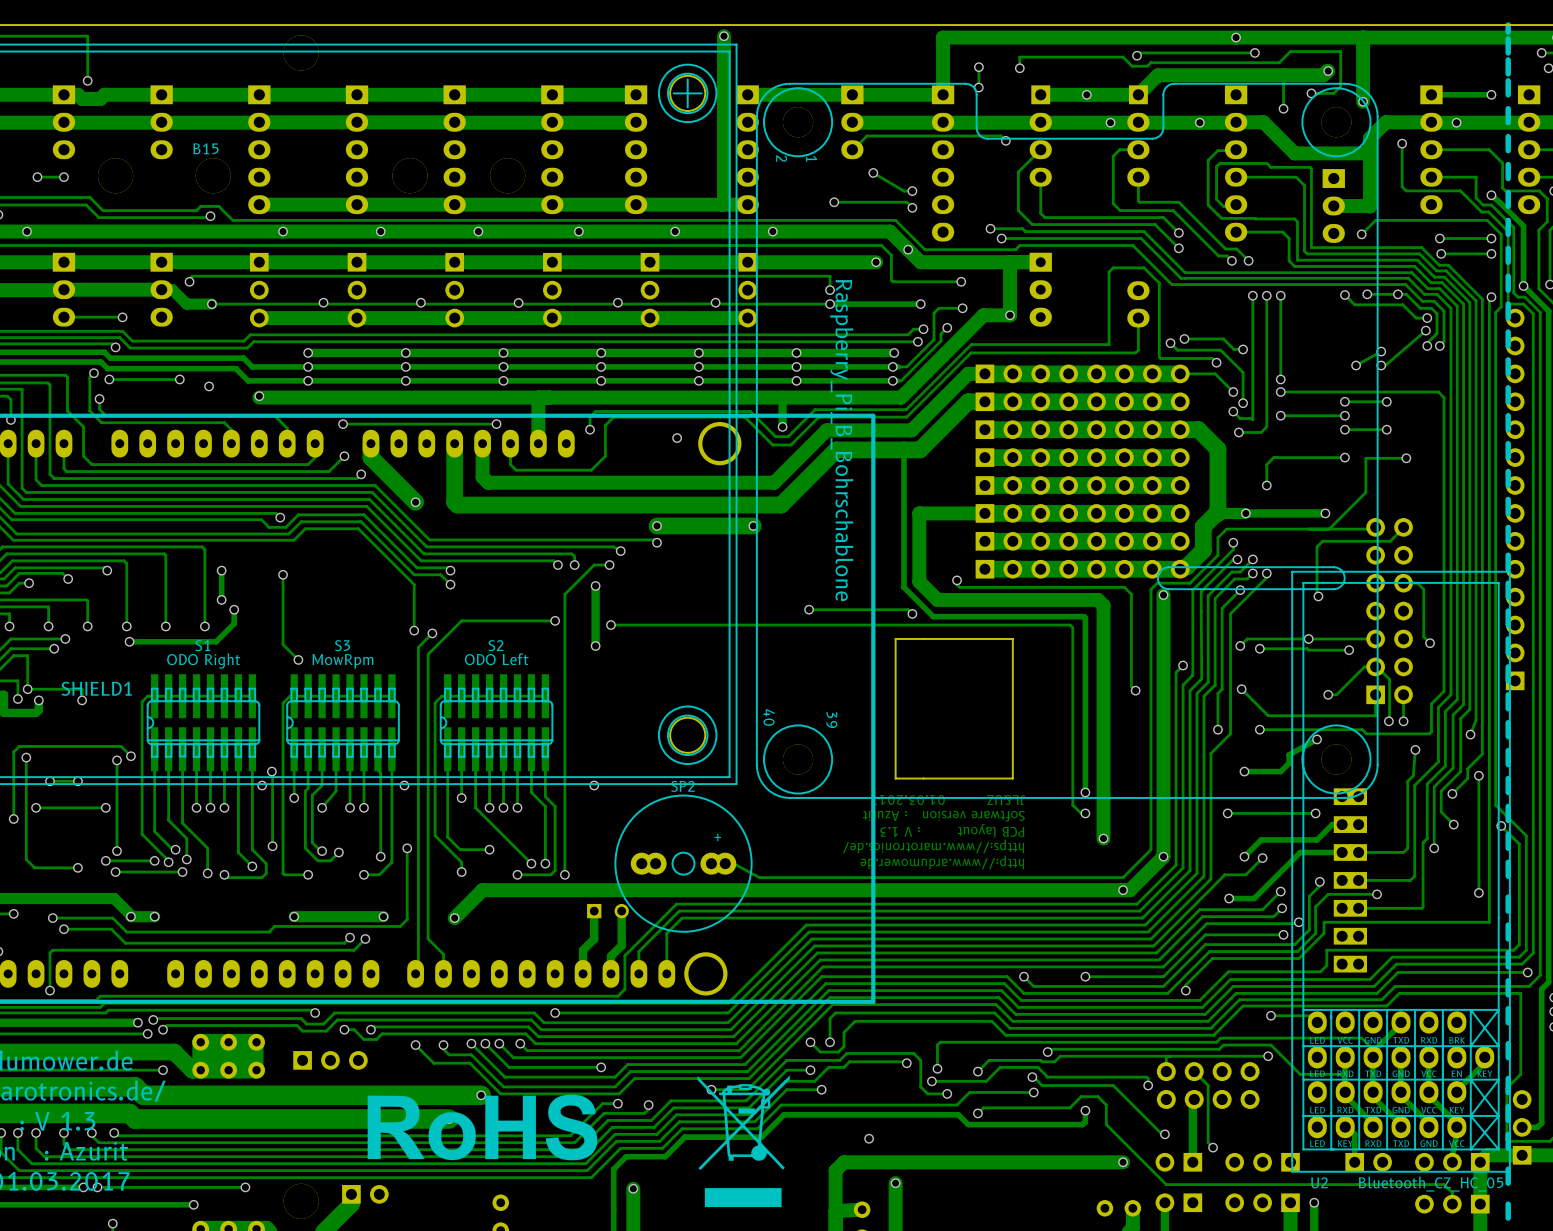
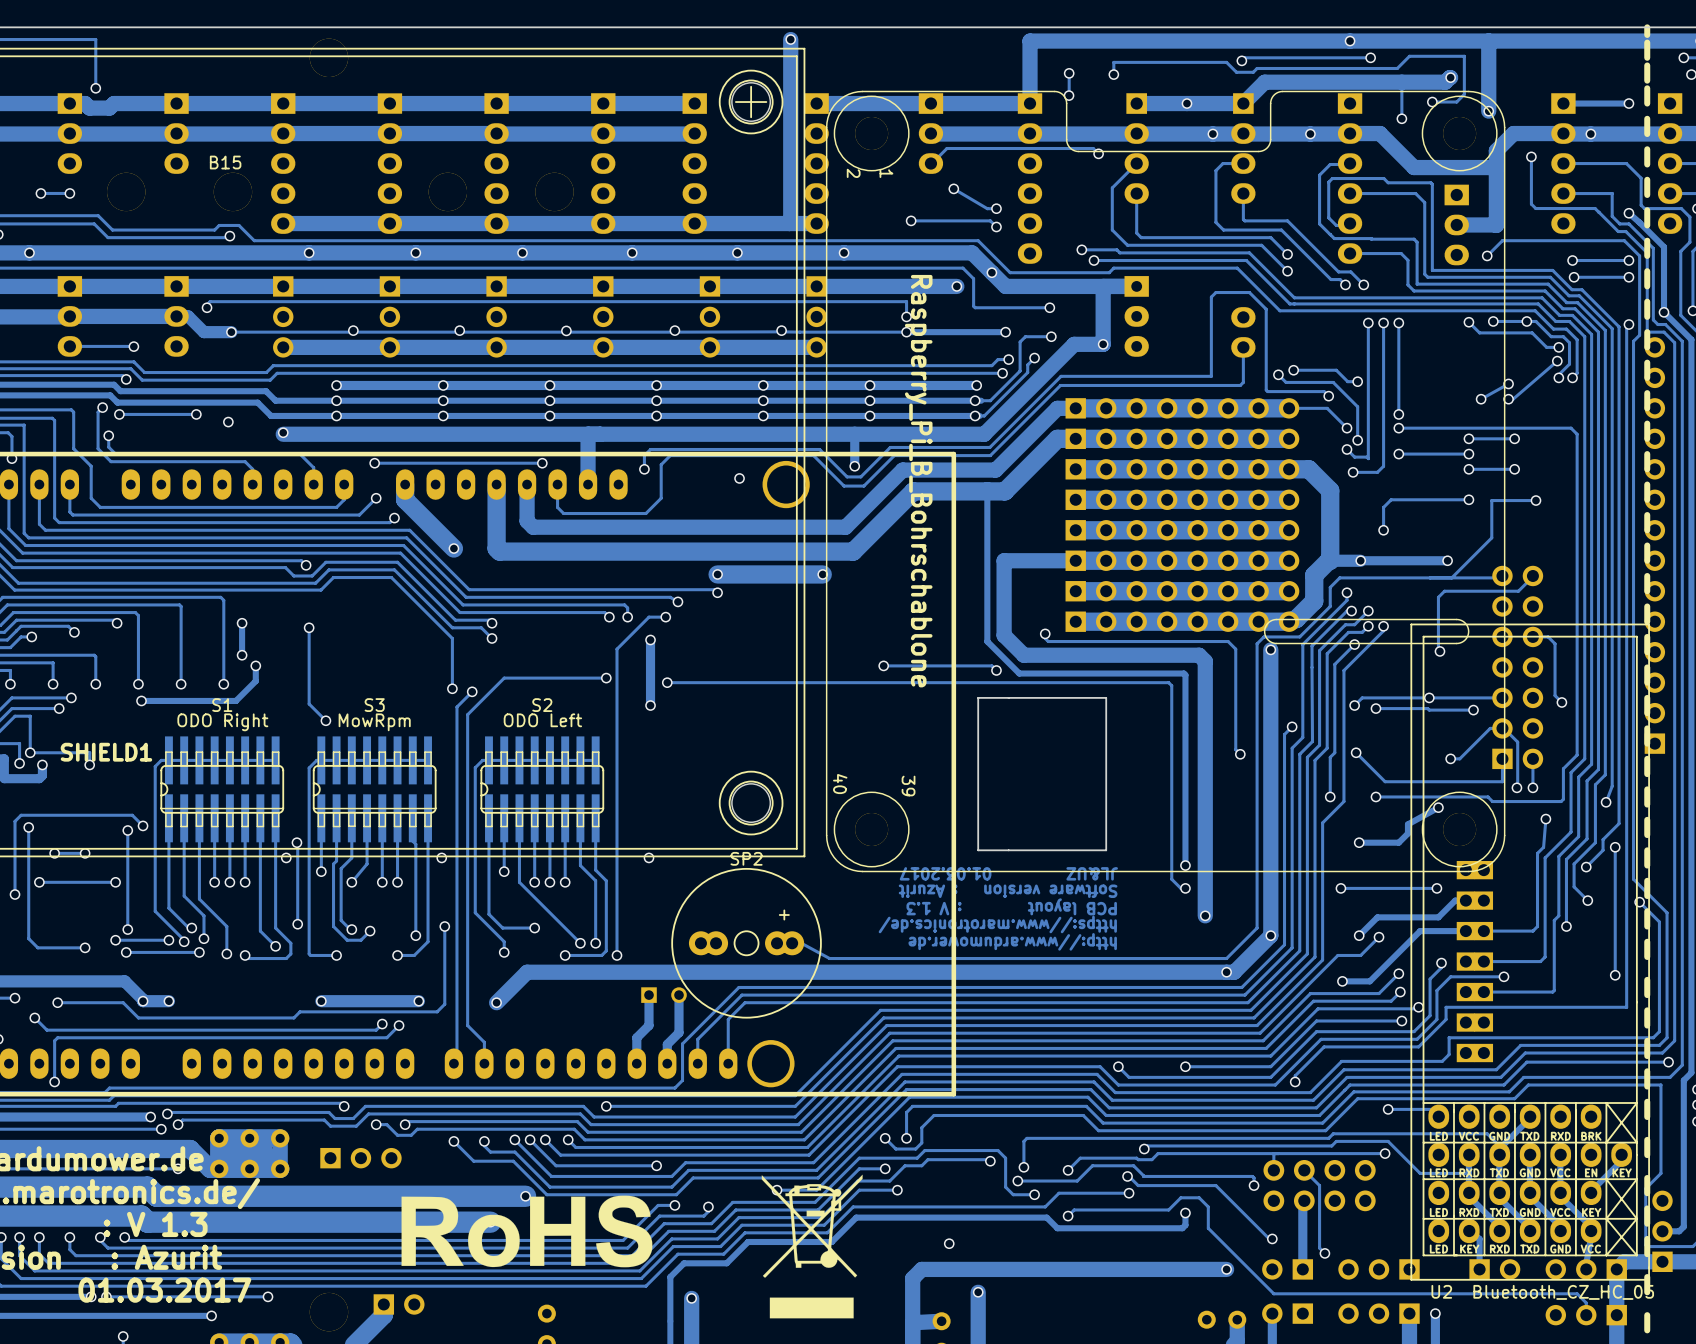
track: (63, 929) (111, 929) (125, 943) -> (34, 1017) (47, 1030) (136, 1030)
via position: (63, 929) -> (34, 1017)

